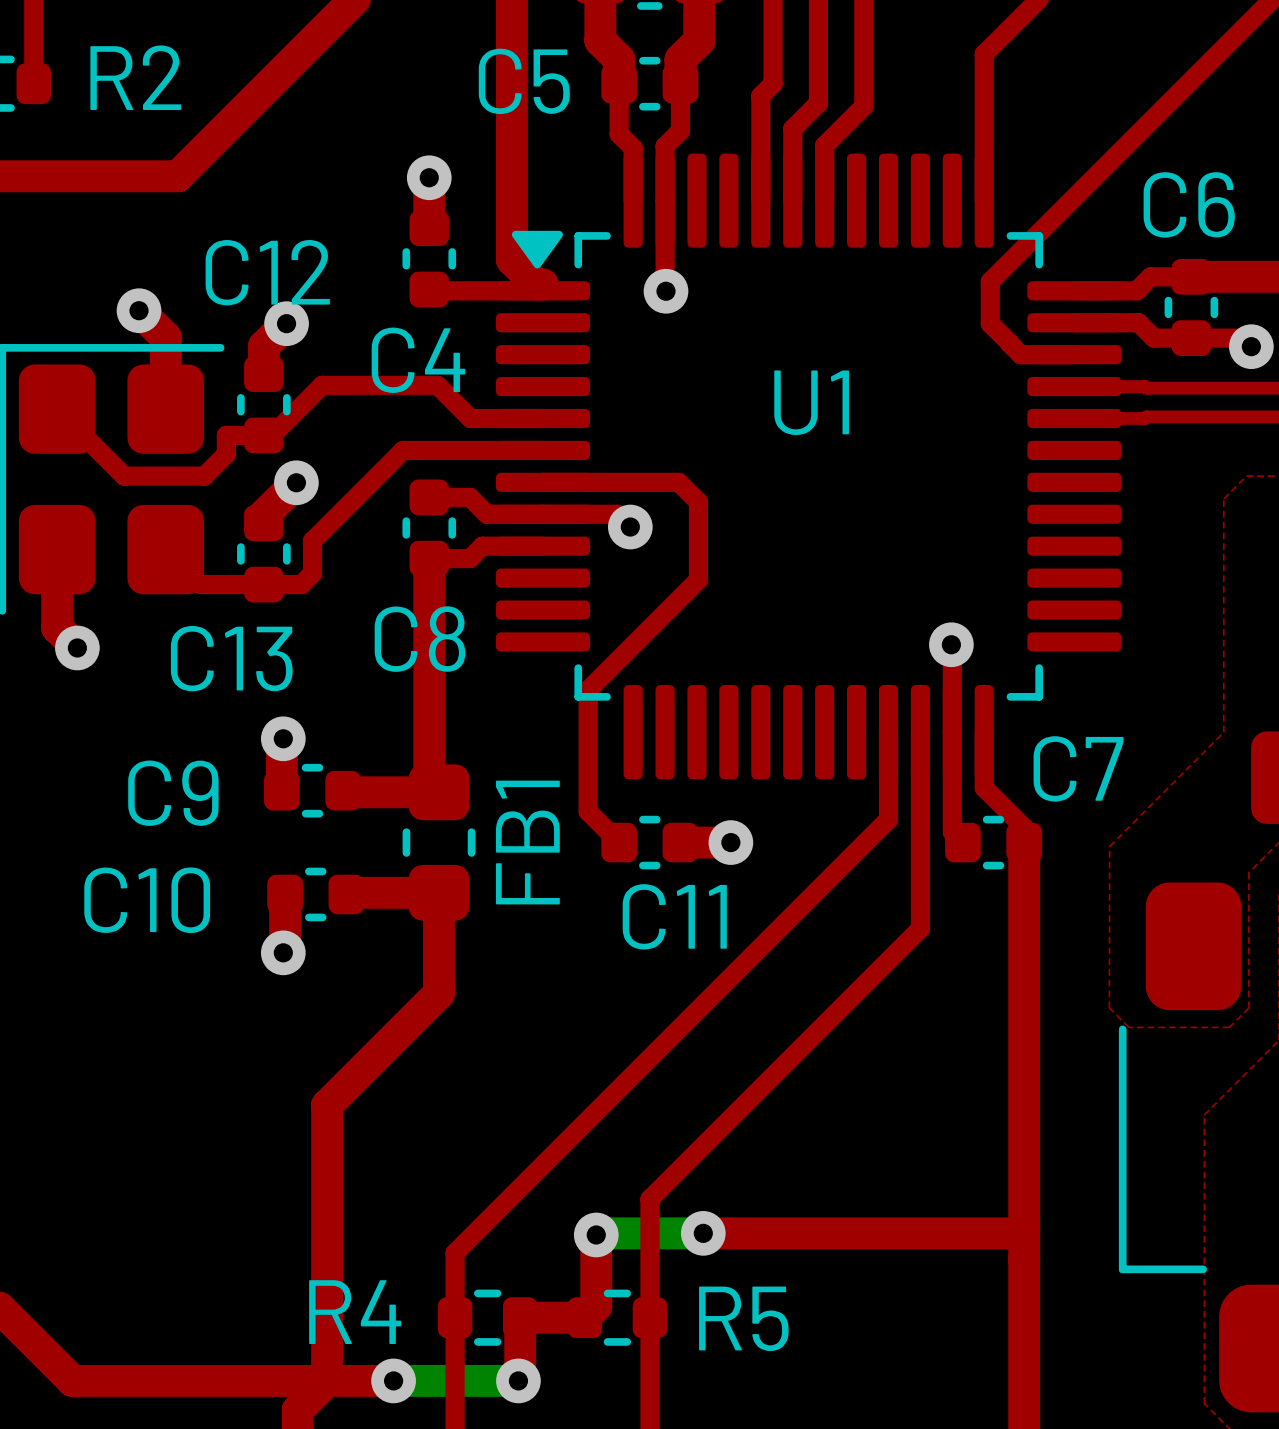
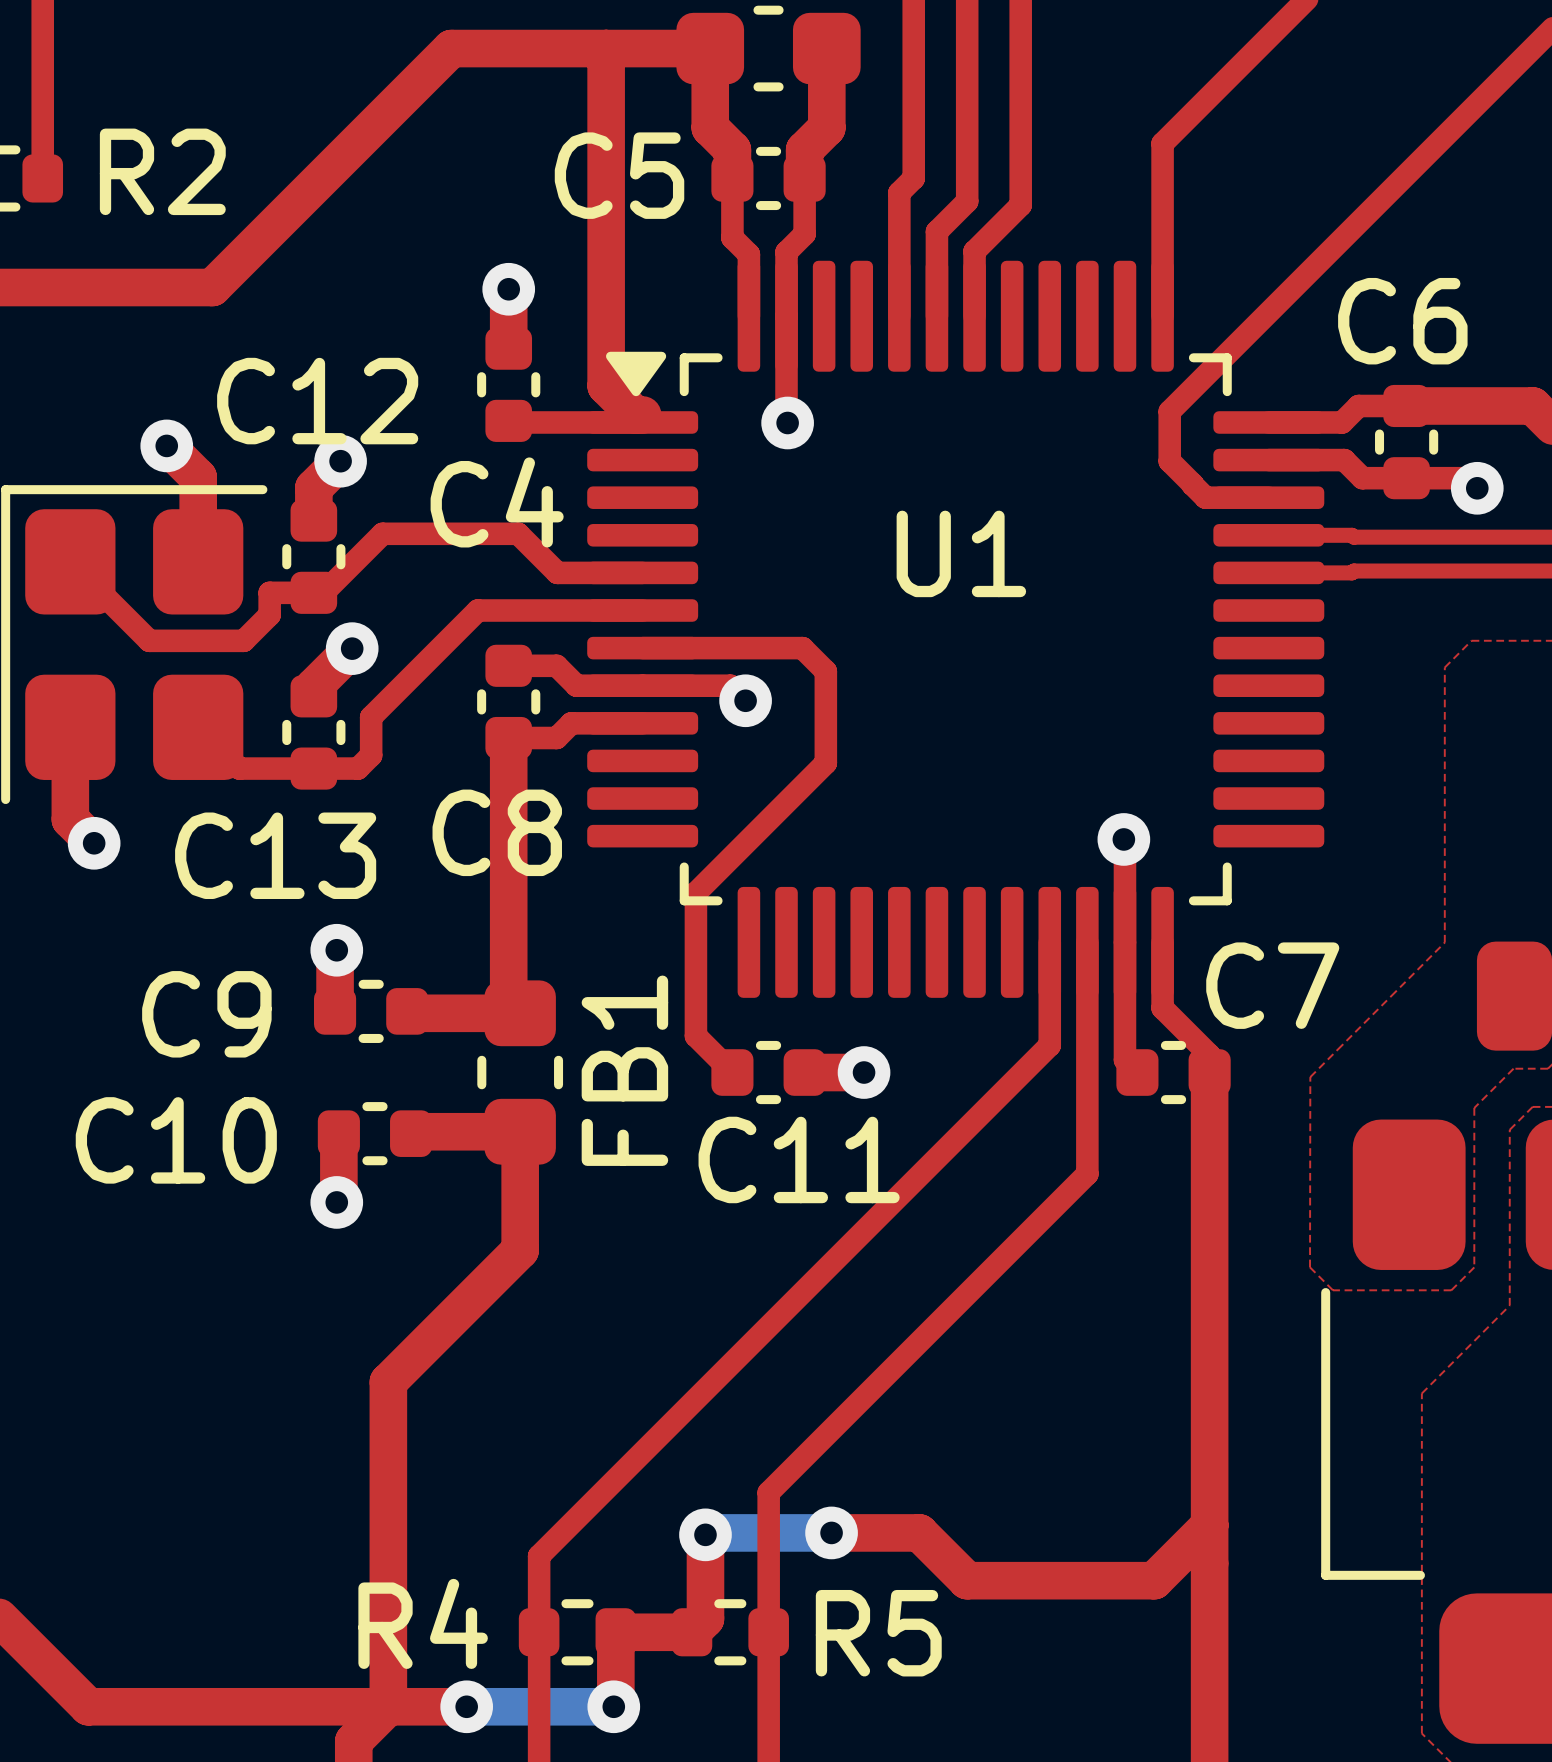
top track: (777, 1233) (1017, 1233) -> (919, 1532) (967, 1580) (1154, 1580) (1201, 1532)

